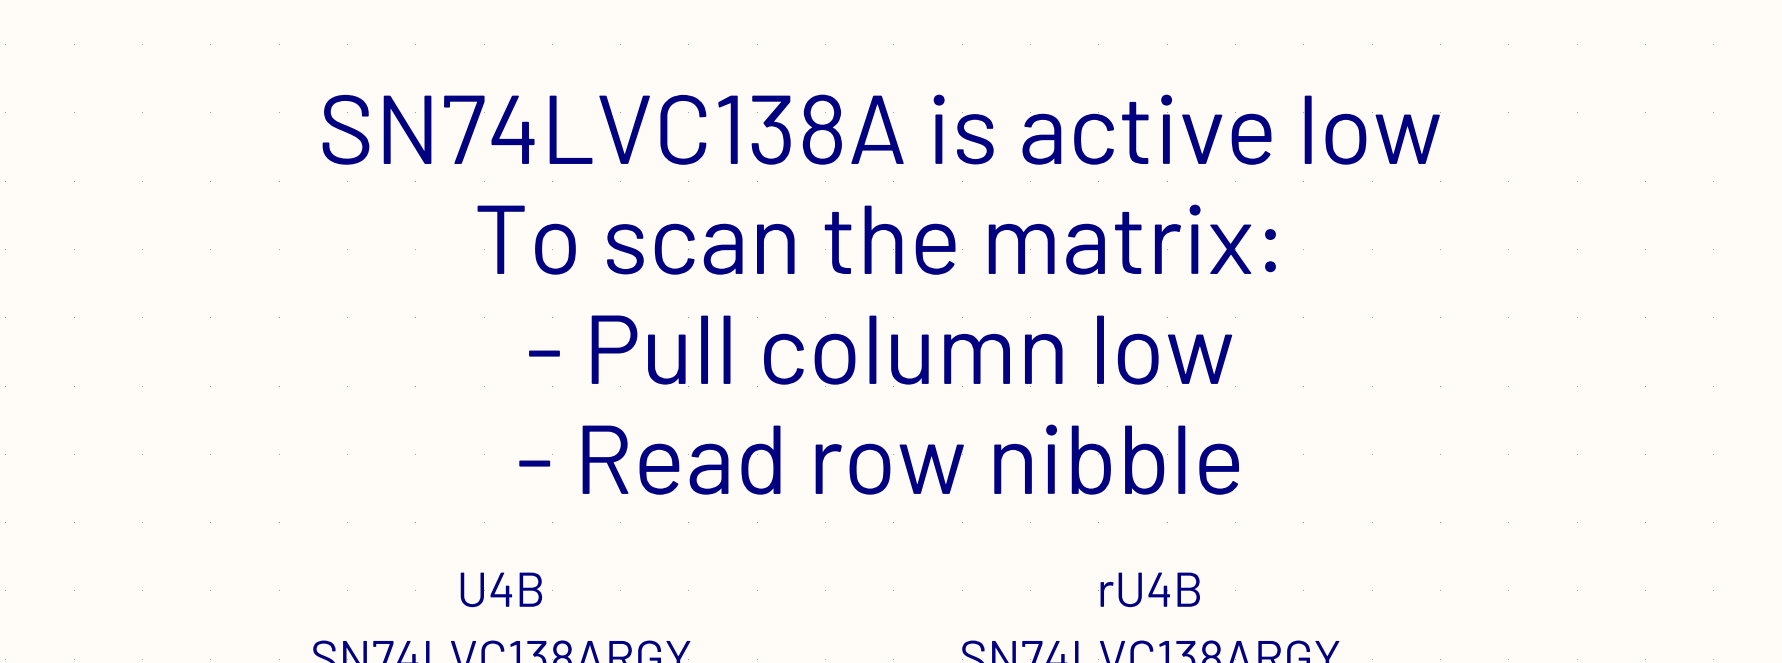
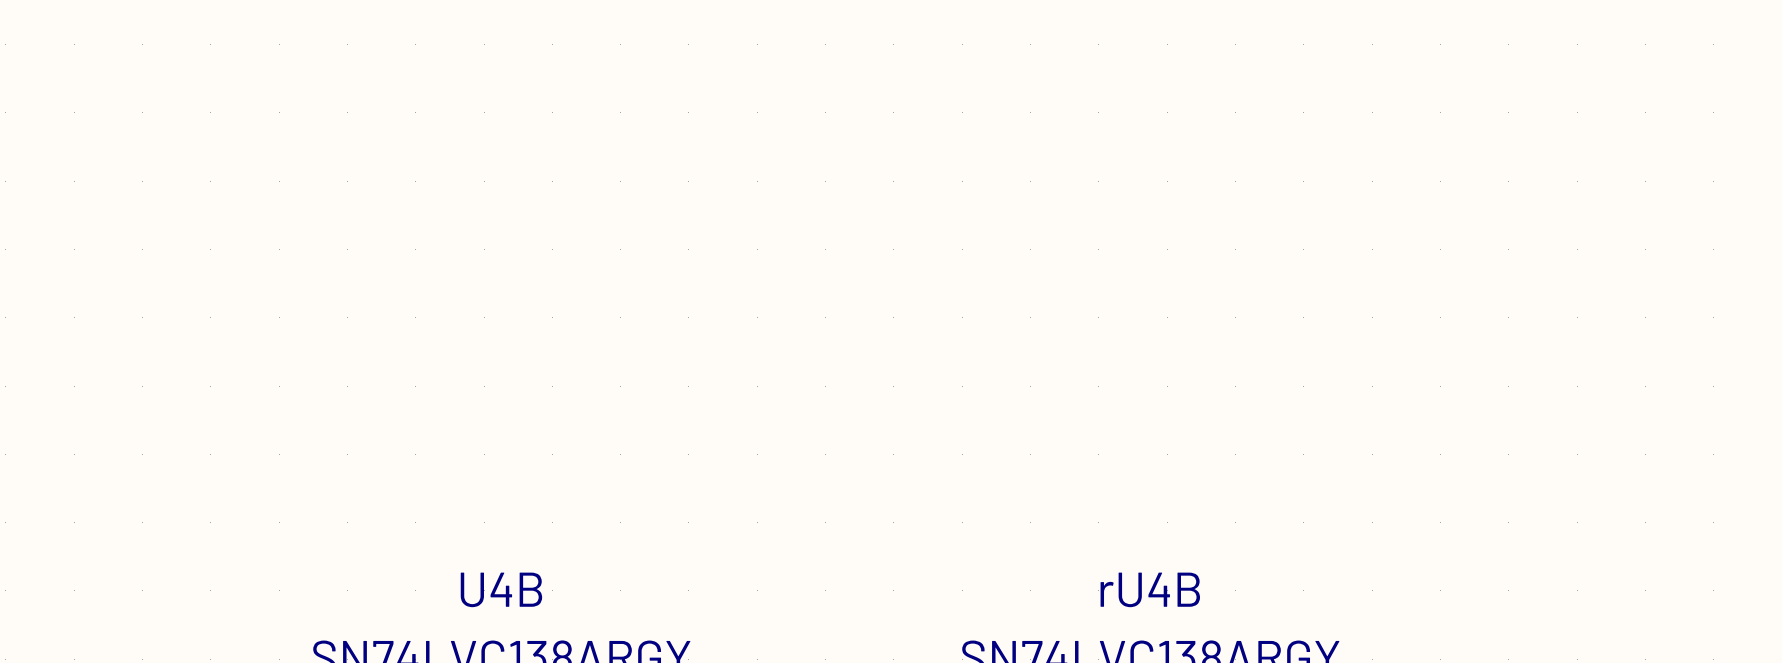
text: SN74LVC138A is active low (881, 129) -> none
text: To scan the matrix: (876, 239) -> none
text: - Pull column low (880, 350) -> none
text: - Read row nibble (879, 459) -> none

